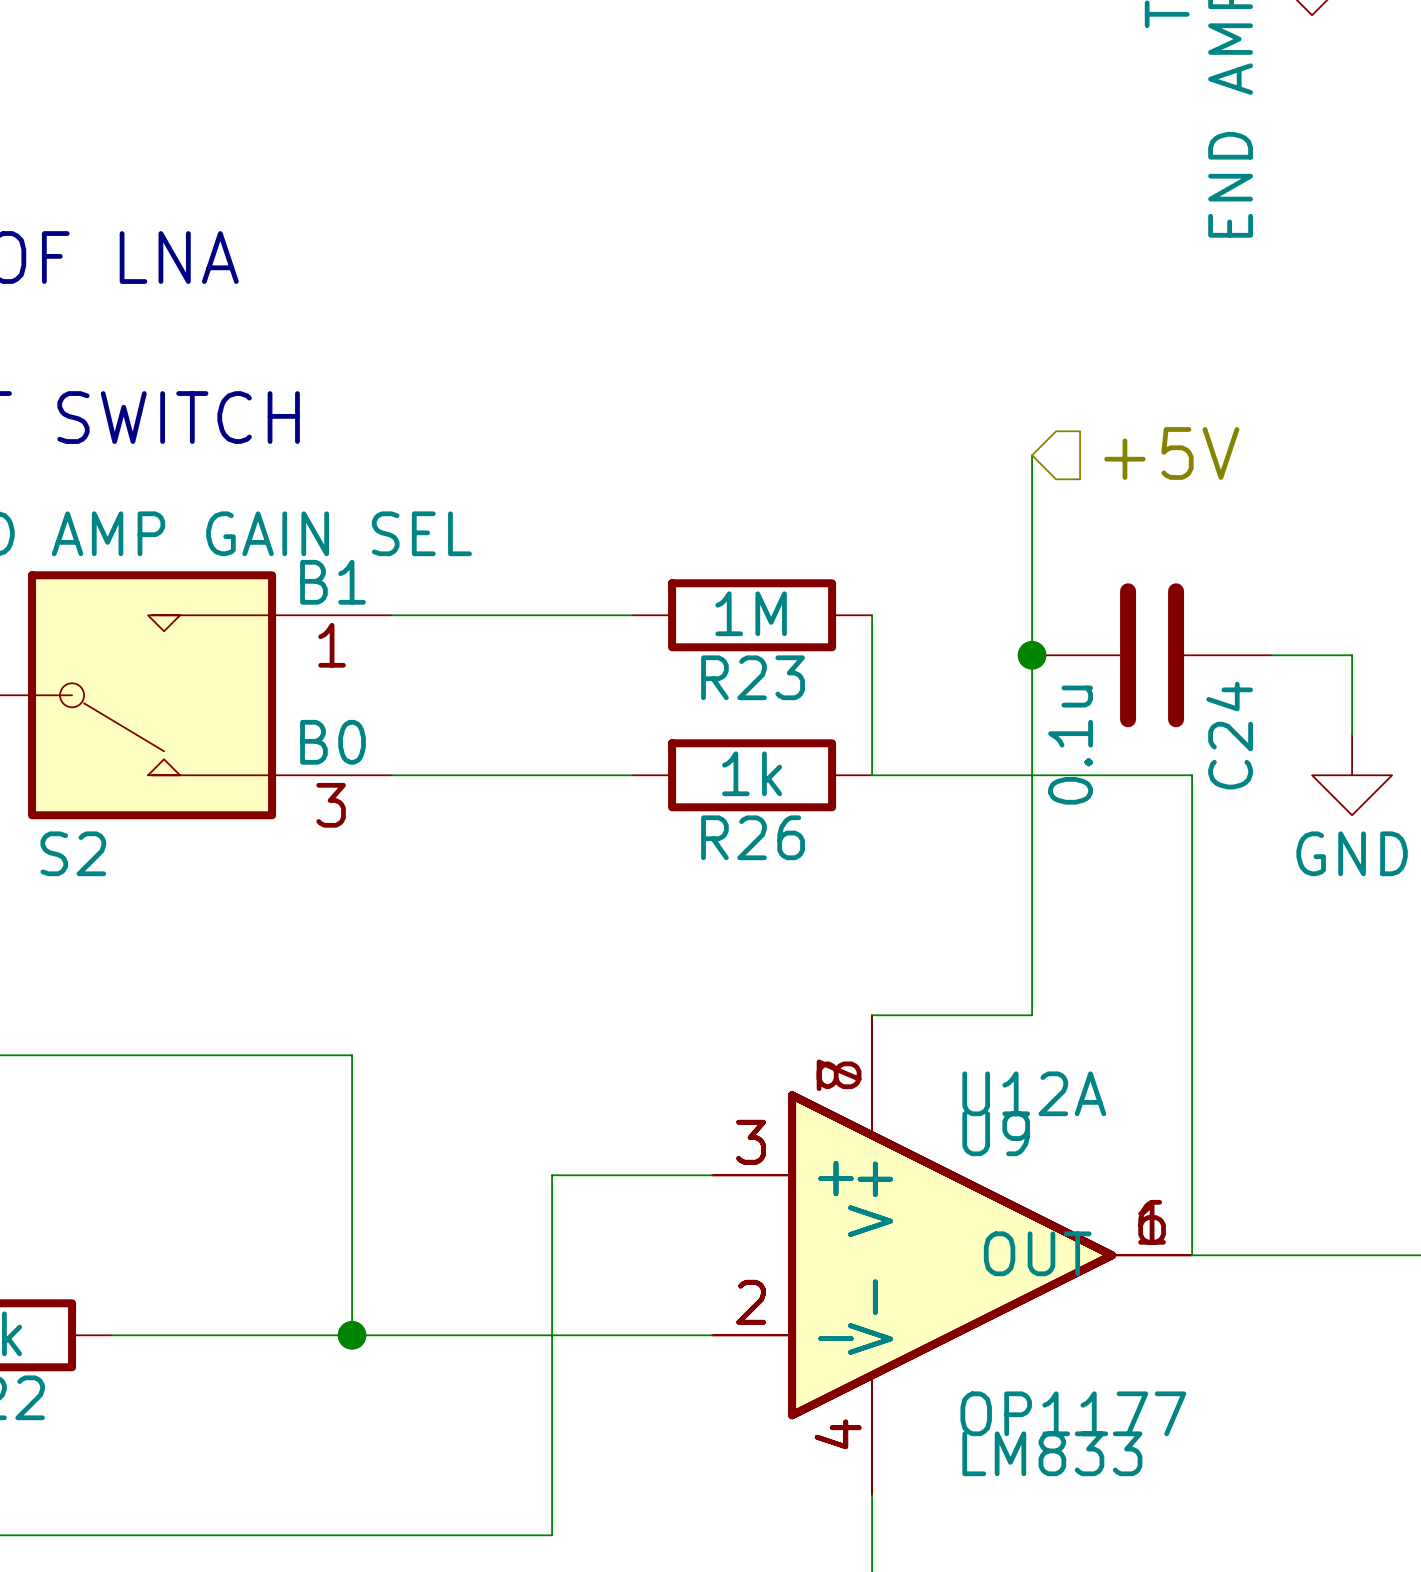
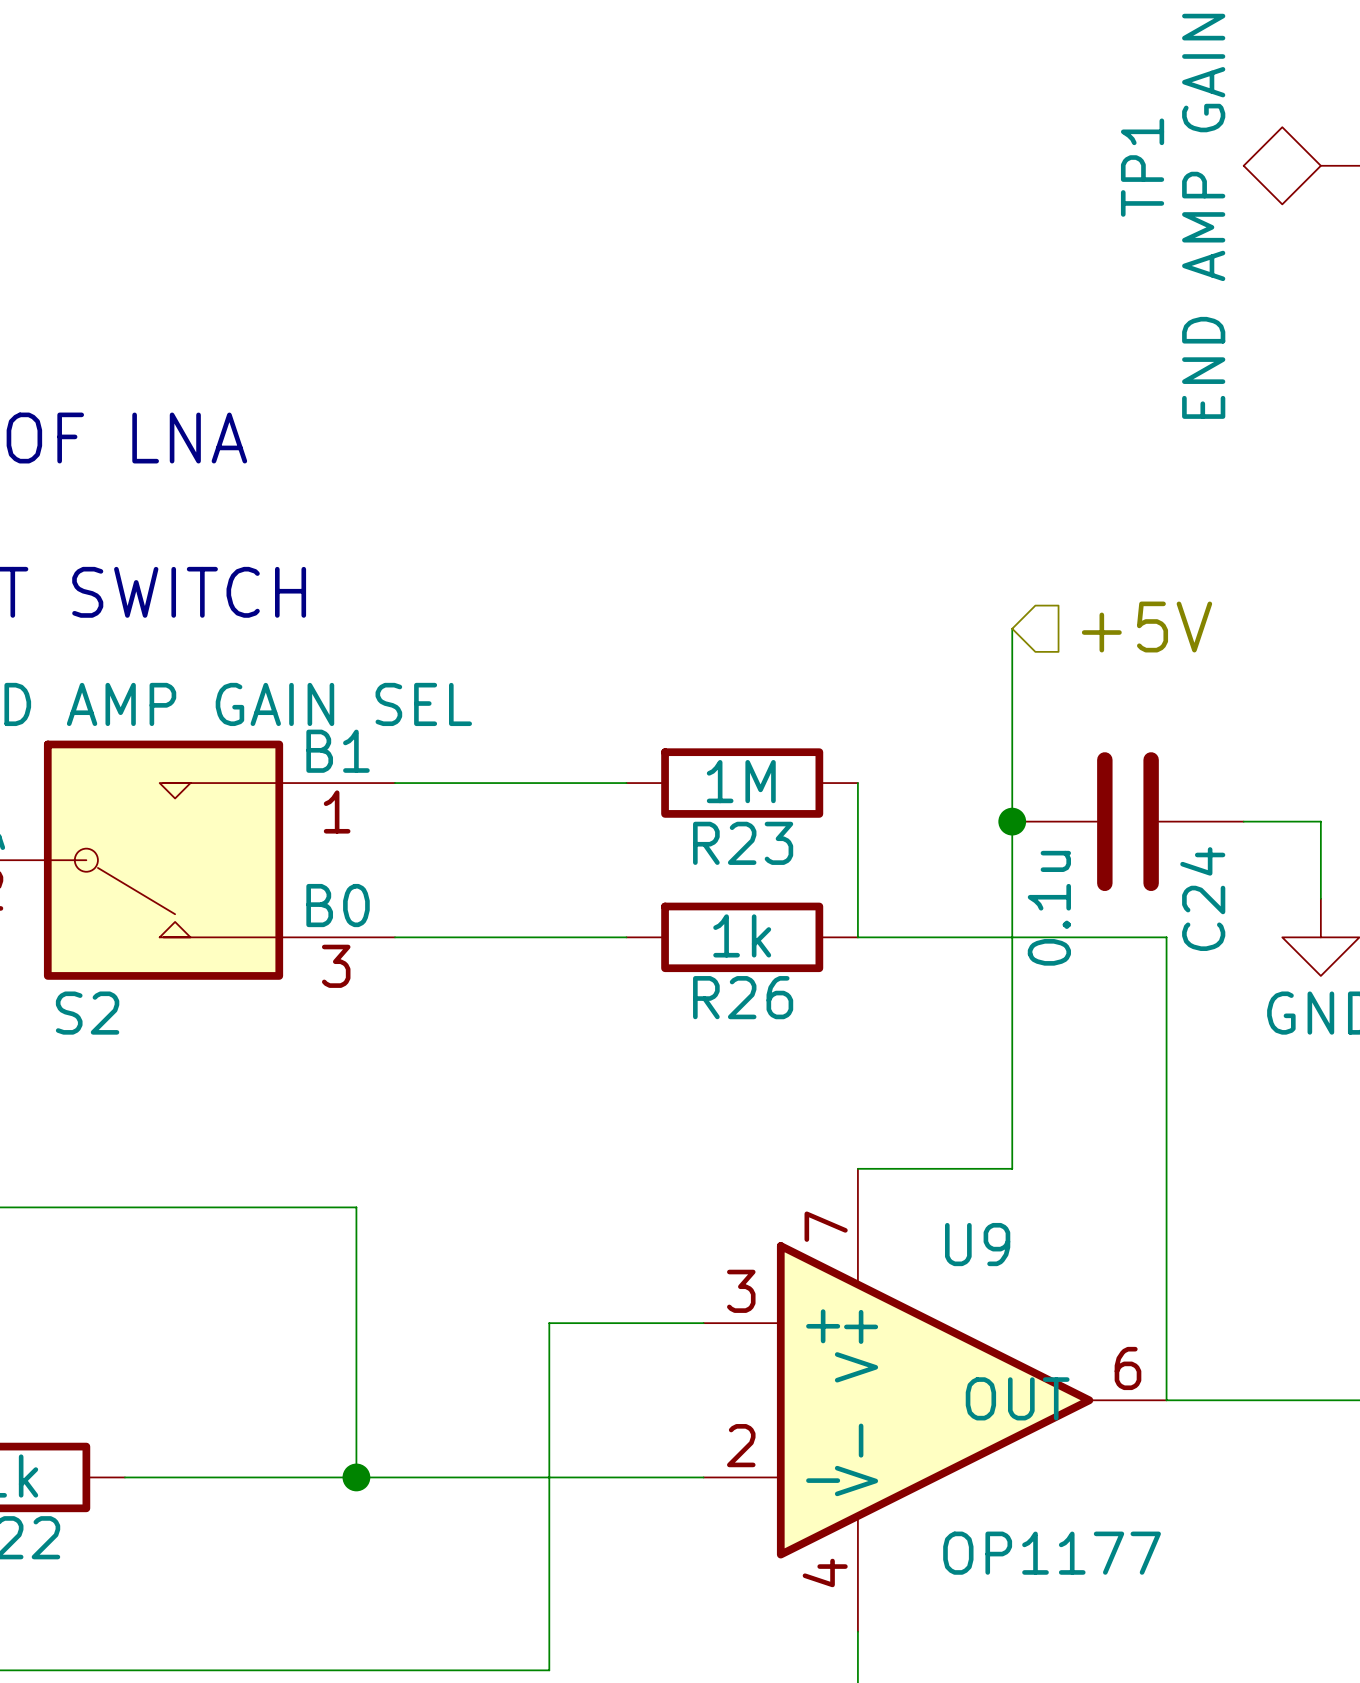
U9 name position: U9 (996, 1133) -> U9 (977, 1244)
U12A: LM833 (952, 1255) -> none

